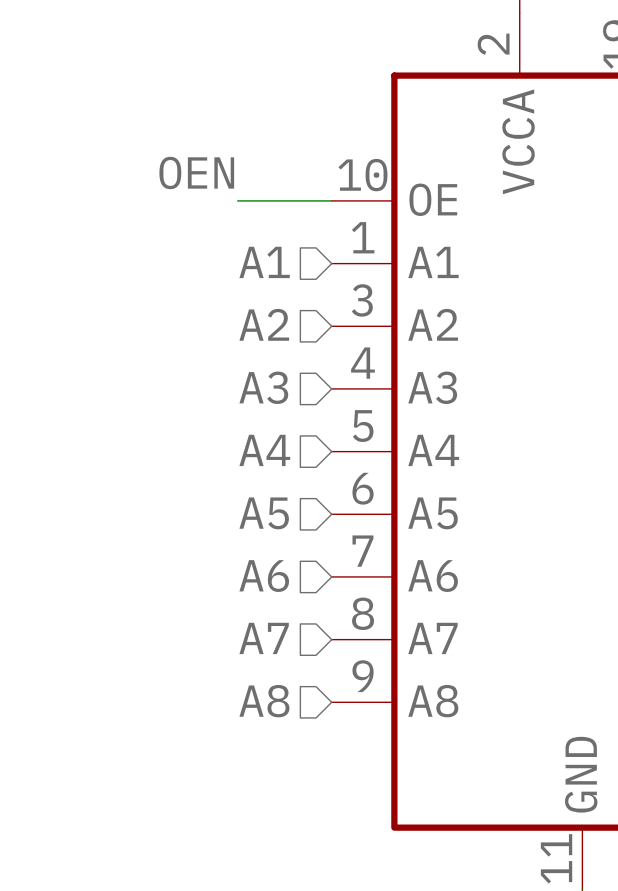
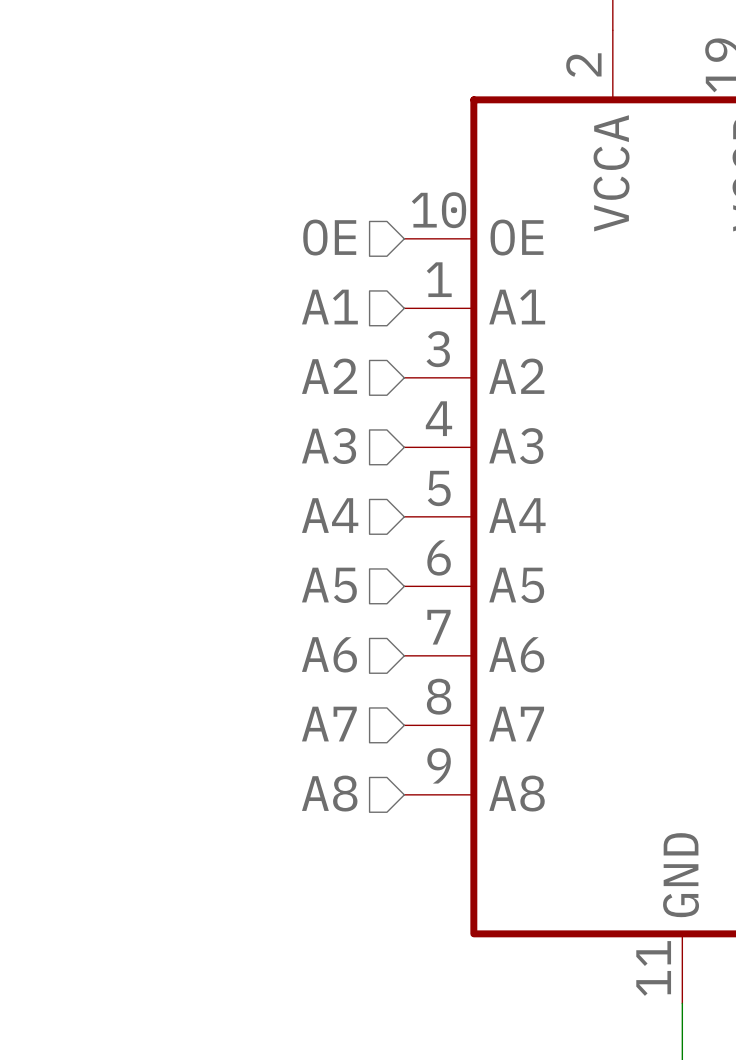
label: OEN (196, 172) -> none
hierarchical label: none -> OE (329, 237)
wire: (237, 200) (331, 200) -> none

